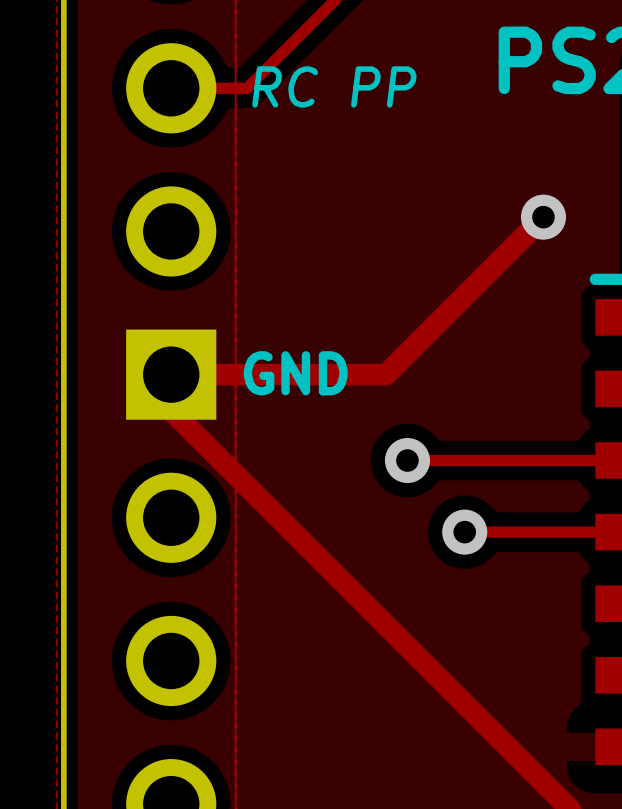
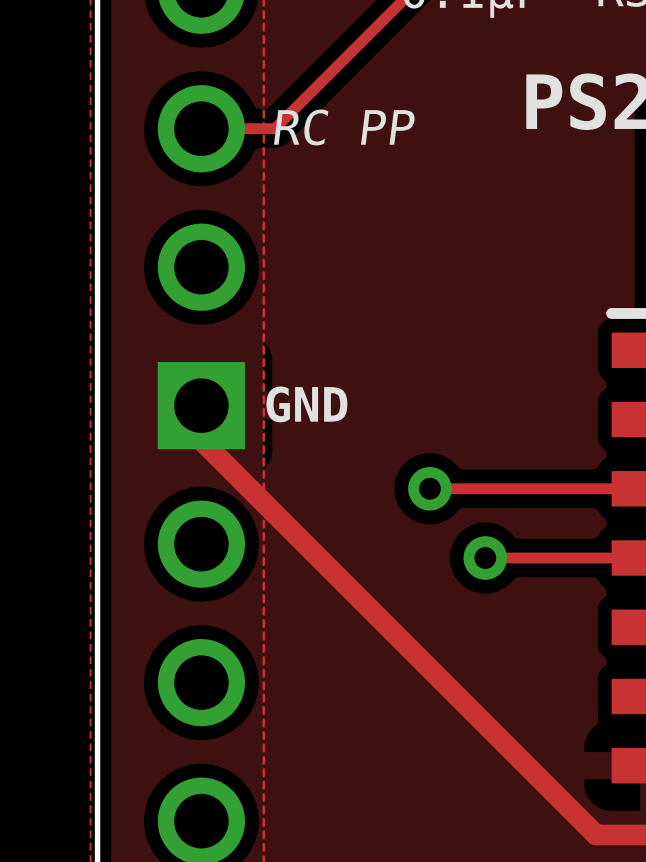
track: (543, 217) (385, 374) (171, 374) -> none
via: (543, 217) -> none

